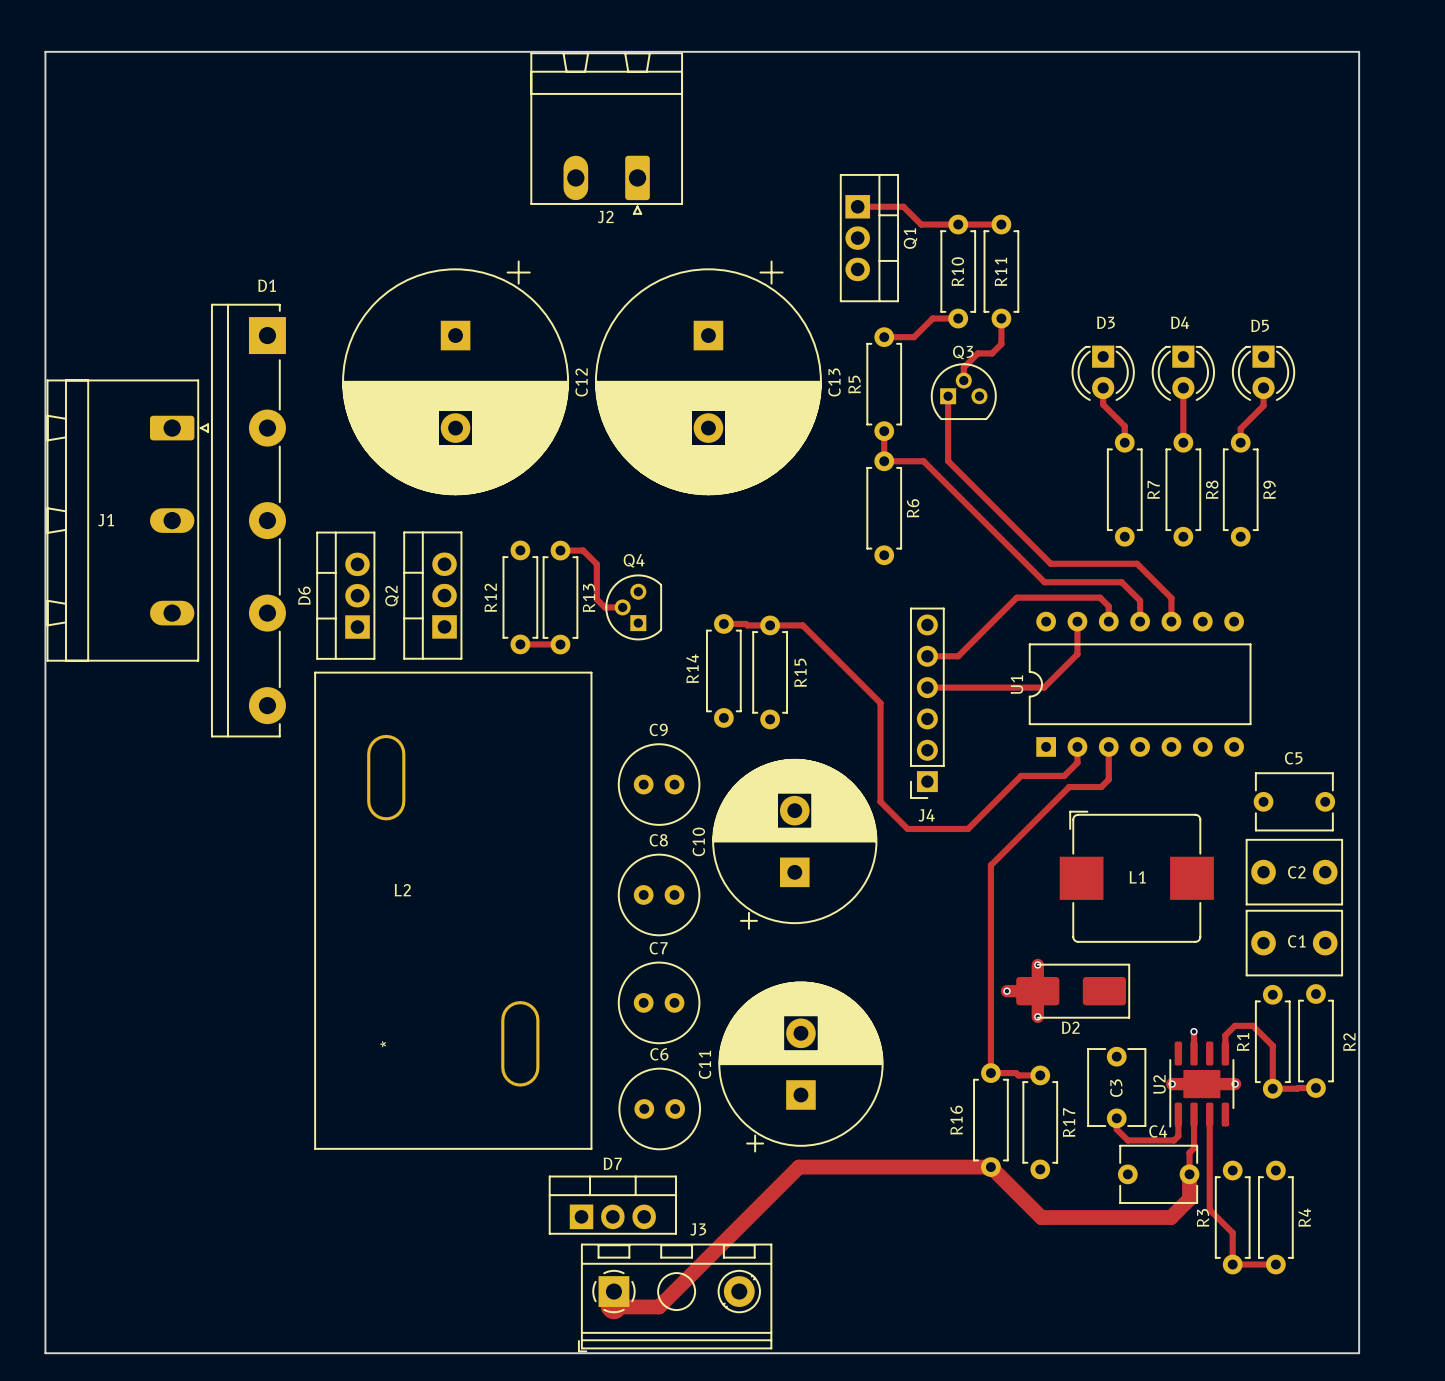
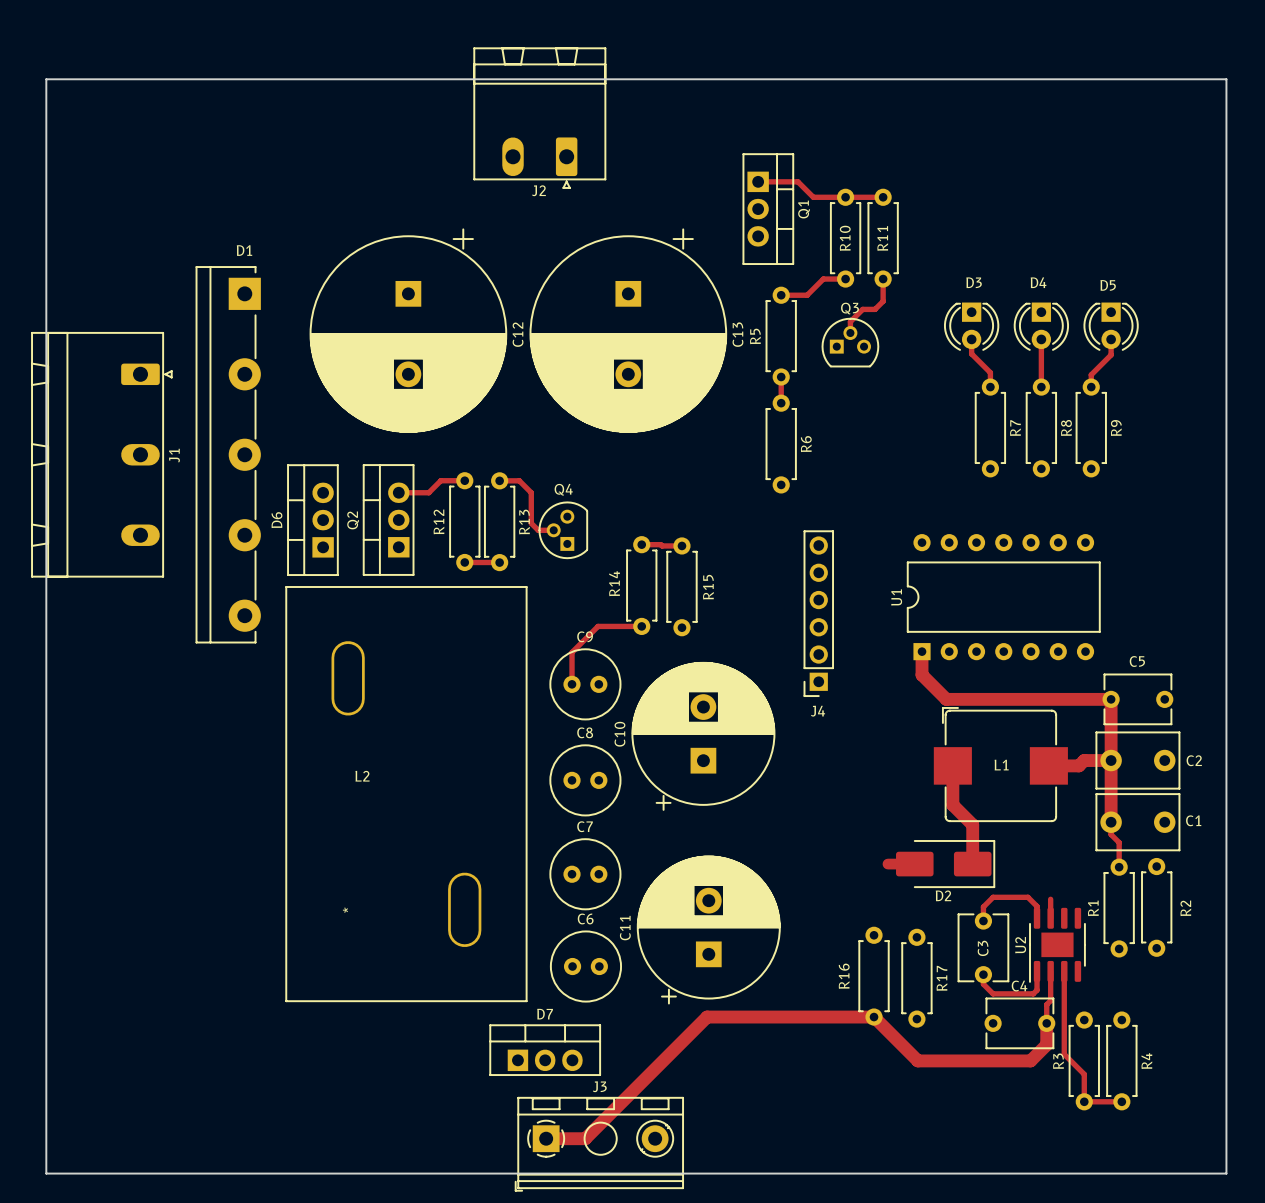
board edge: (45, 51) (1359, 51) (1359, 1353) (45, 1353) (45, 51) -> (46, 79) (46, 1173) (1226, 1173) (1226, 79) (46, 79)
track: (948, 396) (948, 461) (1050, 563) (1137, 563) (1171, 598) (1171, 621) -> none
track: (884, 461) (923, 461) (1044, 582) (1121, 582) (1140, 600) (1140, 621) -> none
J1 name rotation: 0° (106, 520) -> 90° counterclockwise (174, 455)
J1 name position: J1 (106, 520) -> J1 (174, 455)
J1 position: (127, 520) -> (101, 454)
track: none -> (464, 480) (440, 480) (428, 492) (398, 492)
track: (1077, 621) (1077, 654) (1044, 687) (927, 687) -> none
track: (1108, 621) (1108, 606) (1100, 597) (1016, 597) (958, 656) (927, 656) -> none
track: (770, 625) (802, 625) (880, 703) (880, 801) (907, 828) (968, 828) (1021, 775) (1064, 775) (1077, 762) (1077, 746) -> none
track: none -> (641, 626) (598, 626) (572, 652) (572, 684)
track: none -> (922, 651) (922, 674) (946, 699) (1111, 699) (1111, 834) (1119, 842) (1119, 867)
track: (1108, 746) (1108, 779) (1101, 787) (1069, 787) (990, 865) (990, 1073) (1040, 1075) -> none
track: none -> (1111, 760) (1084, 760) (1078, 765) (1048, 765)
C2 name position: C2 (1296, 872) -> C2 (1194, 760)
track: none -> (952, 765) (952, 805) (972, 824) (972, 864)
C1 name position: C1 (1296, 941) -> C1 (1193, 820)
track: (1037, 964) (1037, 1016) -> none
via: (1037, 964) -> none
via: (1006, 991) -> none
via: (1037, 1016) -> none
via: (1193, 1031) -> none
track: none -> (1037, 918) (1037, 906) (1027, 897) (993, 897) (983, 906) (983, 921)
track: (1225, 1053) (1225, 1035) (1234, 1025) (1252, 1025) (1272, 1045) (1272, 1088) (1315, 1088) -> none
track: (1172, 1084) (1235, 1084) -> none
via: (1172, 1084) -> none
via: (1235, 1084) -> none
J3 name position: J3 (698, 1229) -> J3 (599, 1086)
J3 position: (675, 1297) -> (599, 1144)

